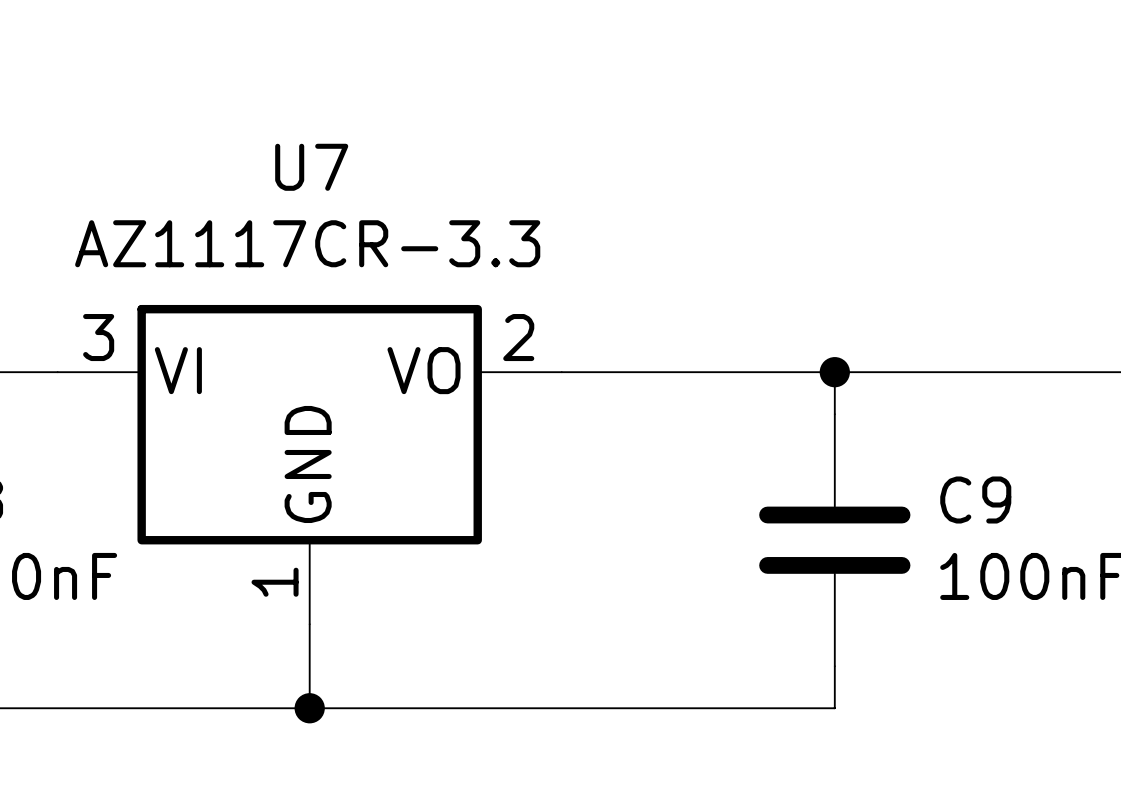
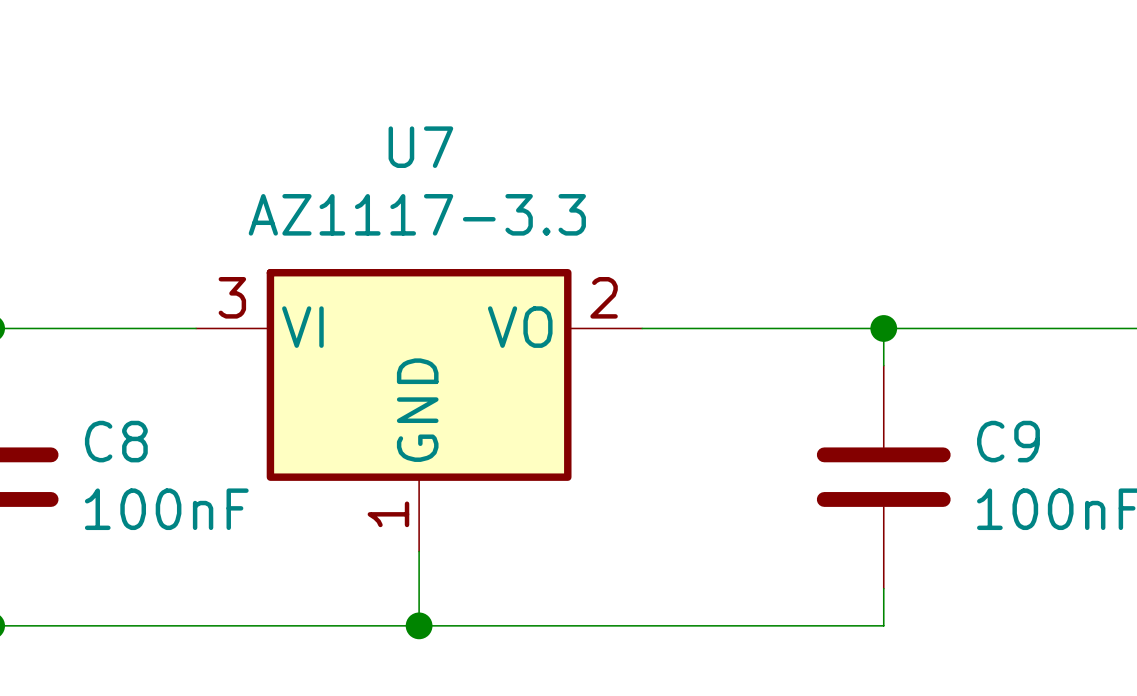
U7 value: AZ1117CR-3.3 (307, 243) -> AZ1117-3.3 (417, 214)

